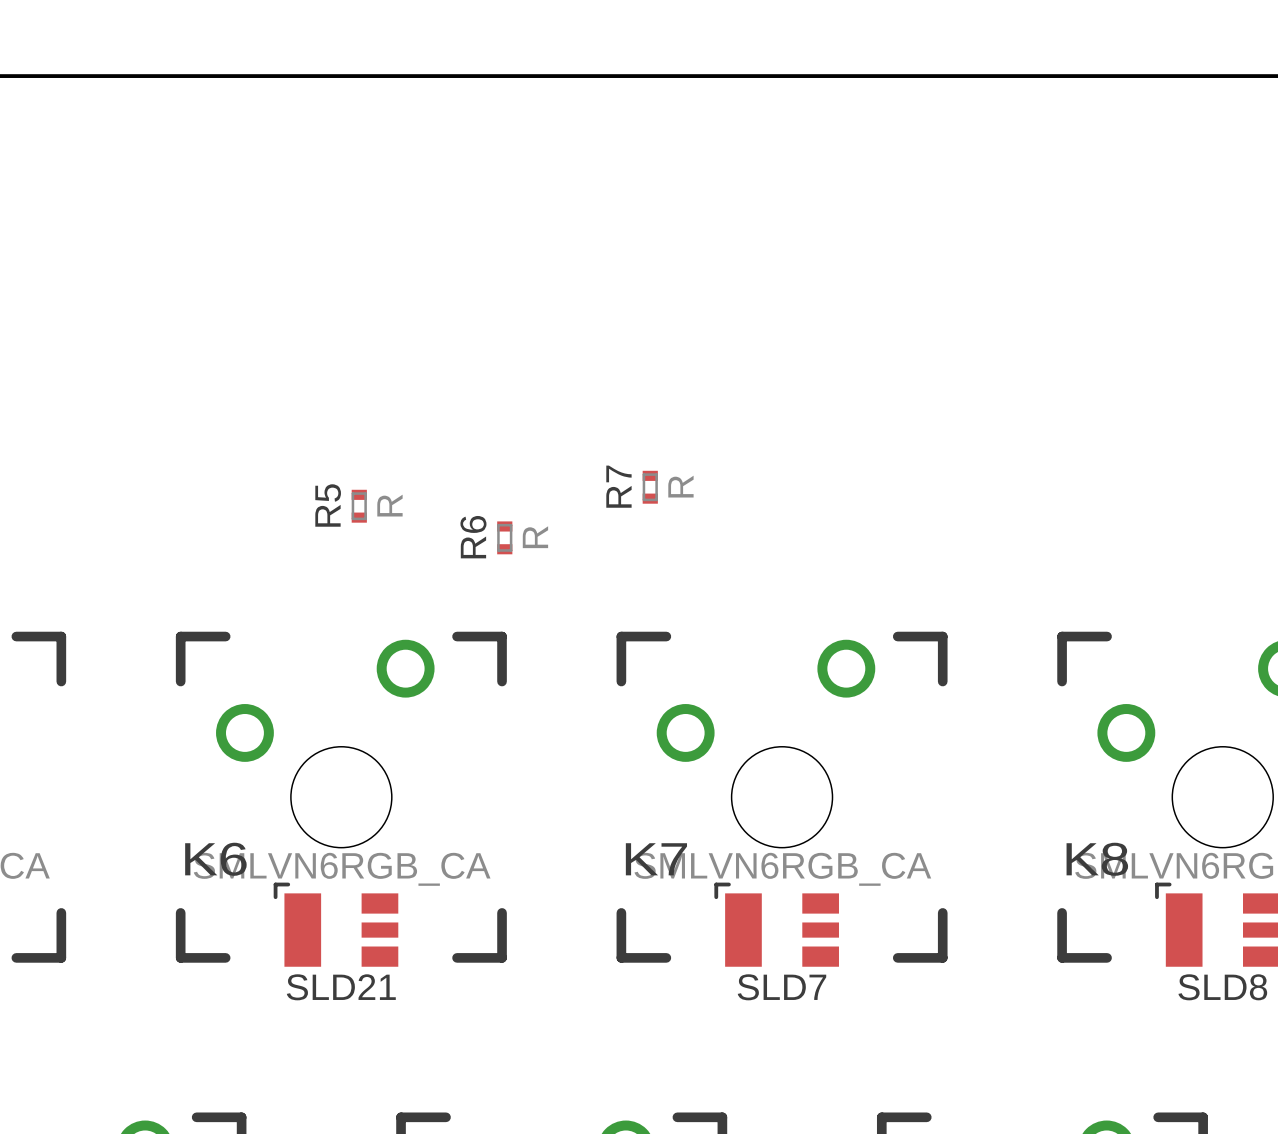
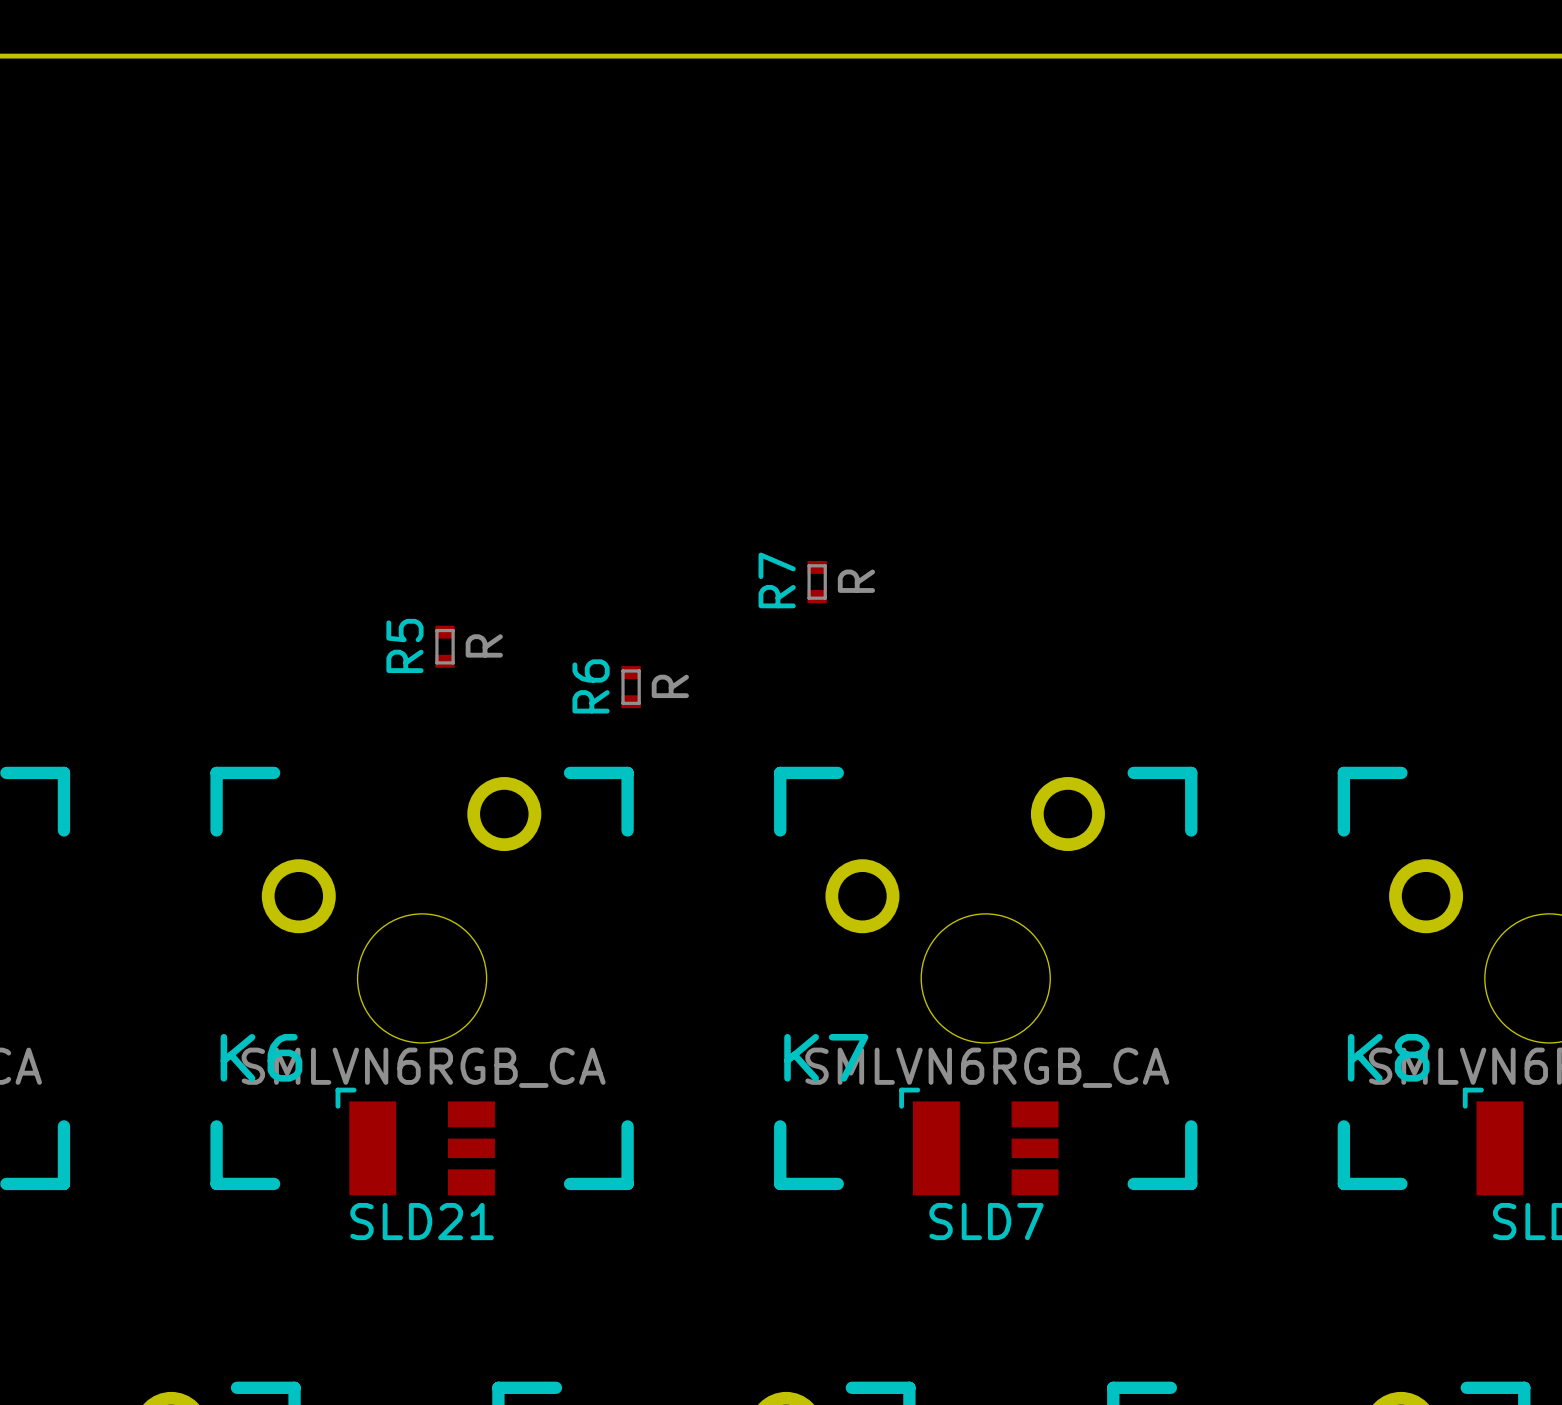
R5 position: (359, 506) -> (445, 646)
R6 position: (504, 537) -> (631, 687)

